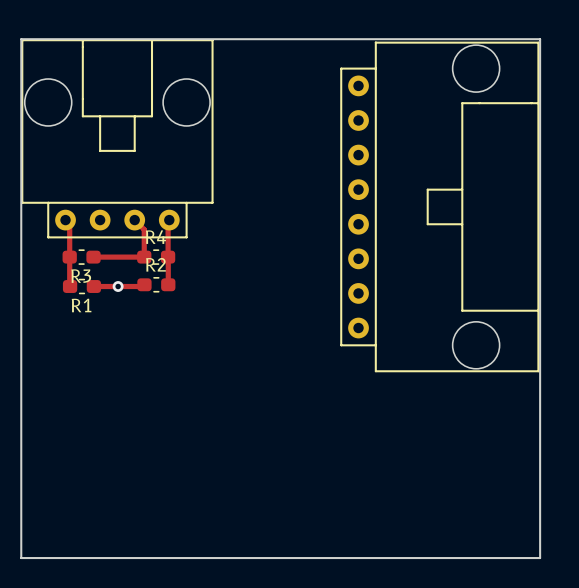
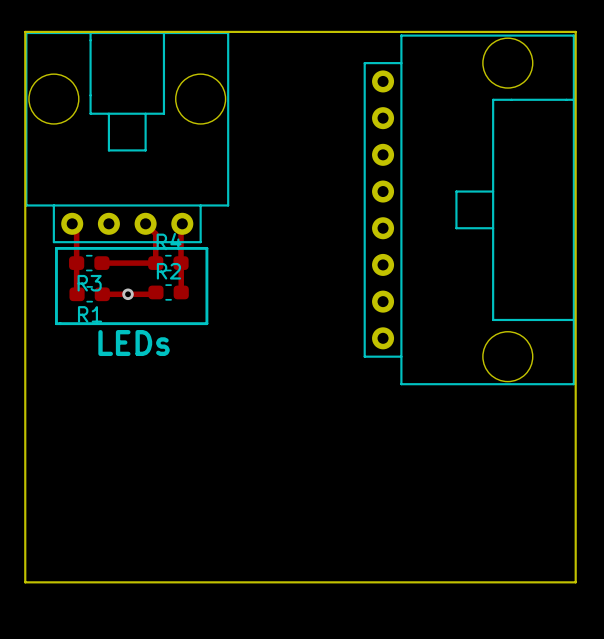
line: none -> (56, 248) (56, 323) (206, 323) (206, 248) (56, 248)
text: none -> LEDs (134, 343)

